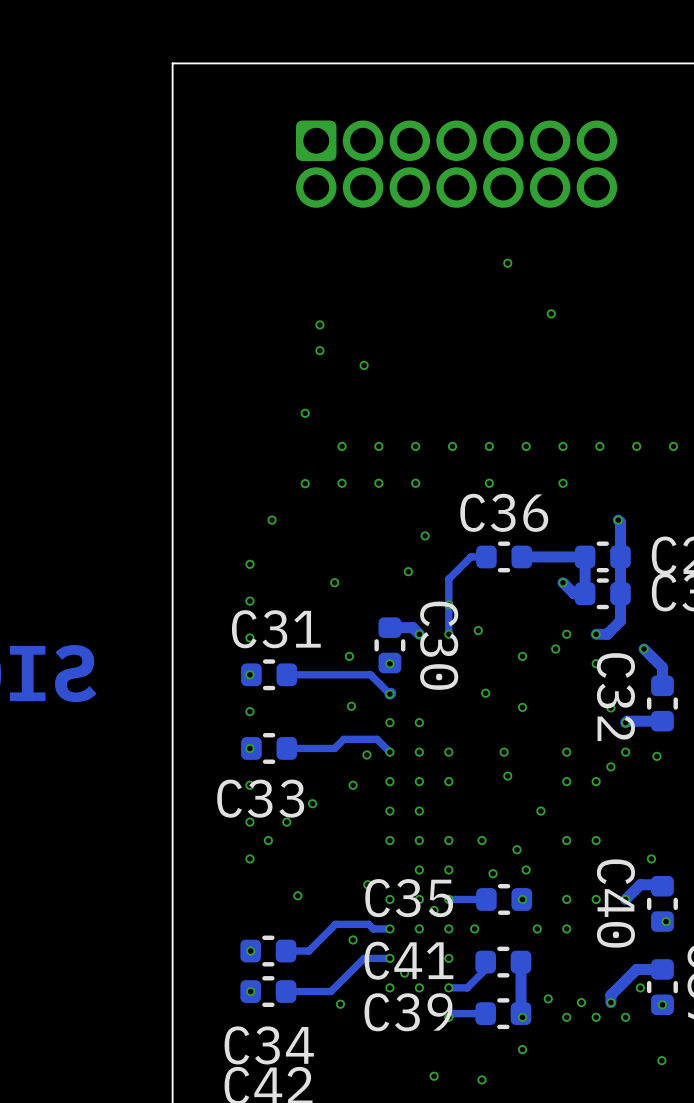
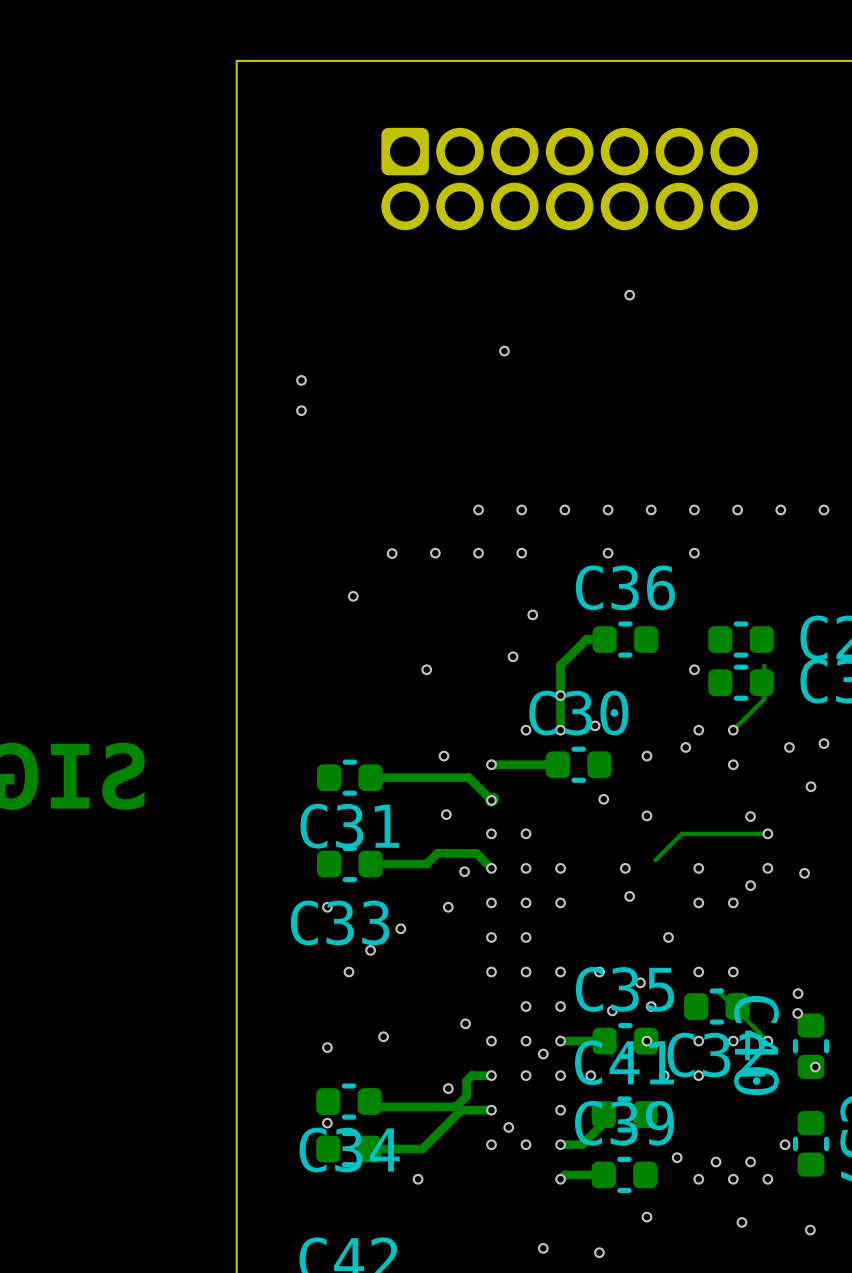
via: none -> (504, 351)
via: (551, 313) -> none
via: (319, 324) -> none
via: none -> (301, 380)
via: (319, 350) -> none
via: none -> (301, 410)
via: (364, 365) -> none
via: (305, 413) -> none
via: (342, 446) -> none
track: (618, 520) (620, 522) (620, 621) (607, 634) (596, 634) -> (764, 665) (764, 699) (733, 730)
via: (618, 520) -> none
track: (521, 556) (585, 556) (585, 593) (574, 593) (563, 582) -> none
via: (249, 564) -> none
via: (249, 601) -> none
track: (389, 627) (412, 627) (419, 634) -> none
C31 name position: C31 (276, 629) -> C31 (349, 826)
via: (249, 637) -> none
C30 rotation: 0° (389, 645) -> 90° clockwise (578, 764)
C30 position: (389, 645) -> (578, 764)
via: none -> (823, 743)
track: (644, 649) (662, 667) (663, 686) -> none
track: none -> (557, 764) (491, 764)
via: (249, 674) -> none
via: none -> (811, 786)
C32 rotation: 0° (662, 703) -> 90° clockwise (716, 1006)
C32 position: (662, 703) -> (716, 1006)
via: (249, 711) -> none
track: (662, 721) (625, 722) -> (655, 860) (681, 833) (767, 833)
via: (249, 748) -> none
via: (249, 822) -> none
via: (249, 858) -> none
via: none -> (797, 1013)
track: (666, 884) (640, 884) (625, 899) -> (720, 989) (720, 993) (767, 1041)
C35 name position: C35 (409, 898) -> C35 (624, 989)
via: none -> (327, 1047)
track: (373, 928) (368, 924) (335, 924) (308, 951) (286, 951) (286, 954) -> (472, 1075) (466, 1080) (466, 1096) (455, 1106) (369, 1105)
via: (250, 951) -> none
C41 name position: C41 (408, 960) -> C41 (624, 1062)
track: (521, 962) (521, 1013) -> none
via: none -> (327, 1123)
track: (662, 969) (636, 969) (610, 995) (610, 1002) -> none
via: (250, 991) -> none
via position: (340, 1004) -> (418, 1179)
via: (662, 1004) -> none
C39 name position: C39 (408, 1012) -> C39 (624, 1123)
via: (522, 1017) -> none
C34 name position: C34 (269, 1045) -> C34 (349, 1150)
via: none -> (741, 1222)

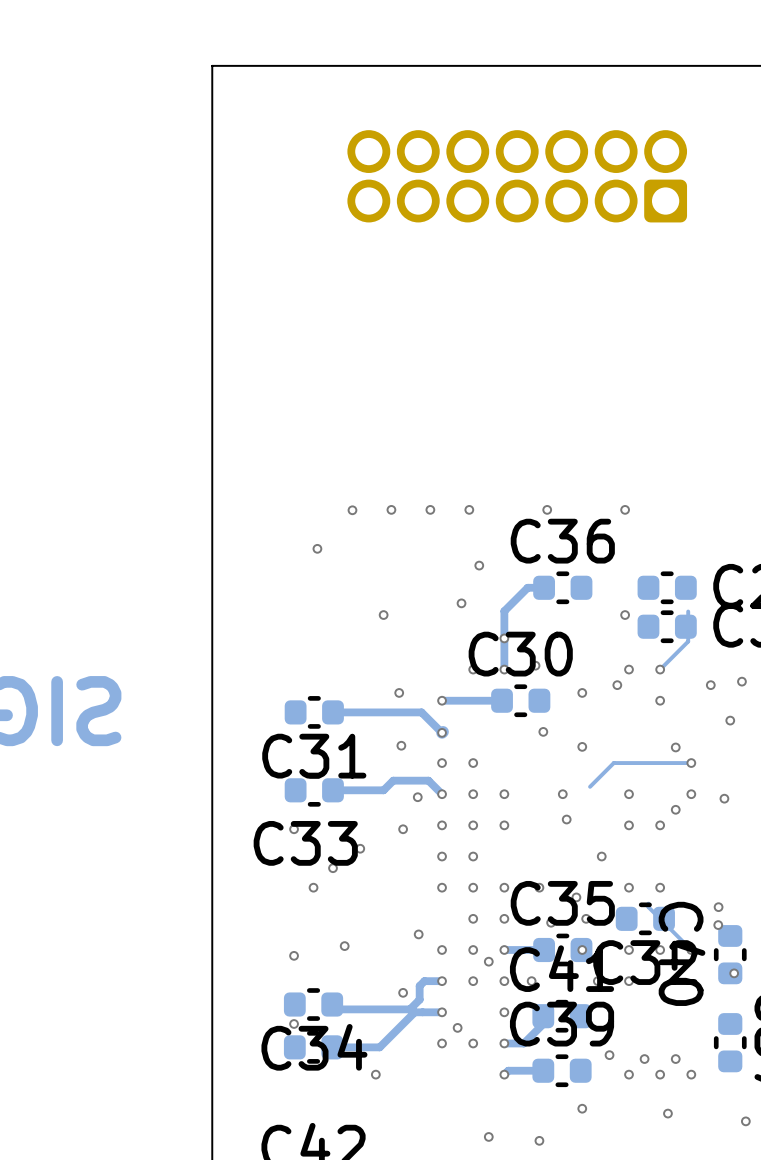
part rotation: 0° (569, 178) -> 180° (517, 176)
via: (629, 295) -> none
via: (504, 351) -> none
via: (301, 380) -> none
via: (301, 410) -> none
via: (478, 509) -> none
via: (521, 509) -> none
via: (564, 509) -> none
via: (608, 509) -> none
via: (651, 509) -> none
via: (694, 509) -> none
via: (737, 509) -> none
via: (780, 509) -> none
via: (823, 509) -> none
via: (785, 1144) -> none
via position: (810, 1230) -> (745, 1121)

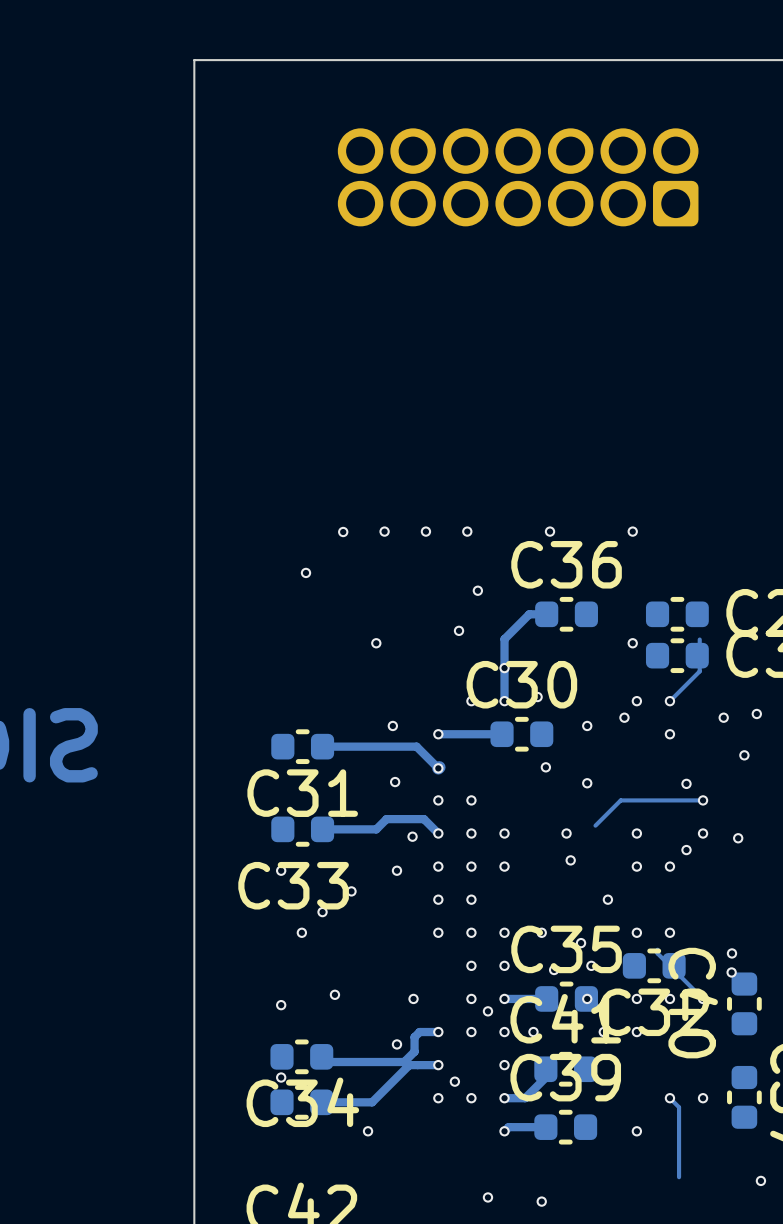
via: (418, 934) -> none
via: none -> (413, 998)
via: (442, 949) -> none
via: (734, 973) -> none
track: none -> (669, 1098) (679, 1107) (679, 1177)
via: none -> (669, 1098)
via: none -> (703, 1098)
via: (609, 1055) -> none
via: (644, 1059) -> none
via: (675, 1059) -> none
via: (660, 1074) -> none
via: (691, 1074) -> none
via: (582, 1108) -> none
via: (667, 1113) -> none

